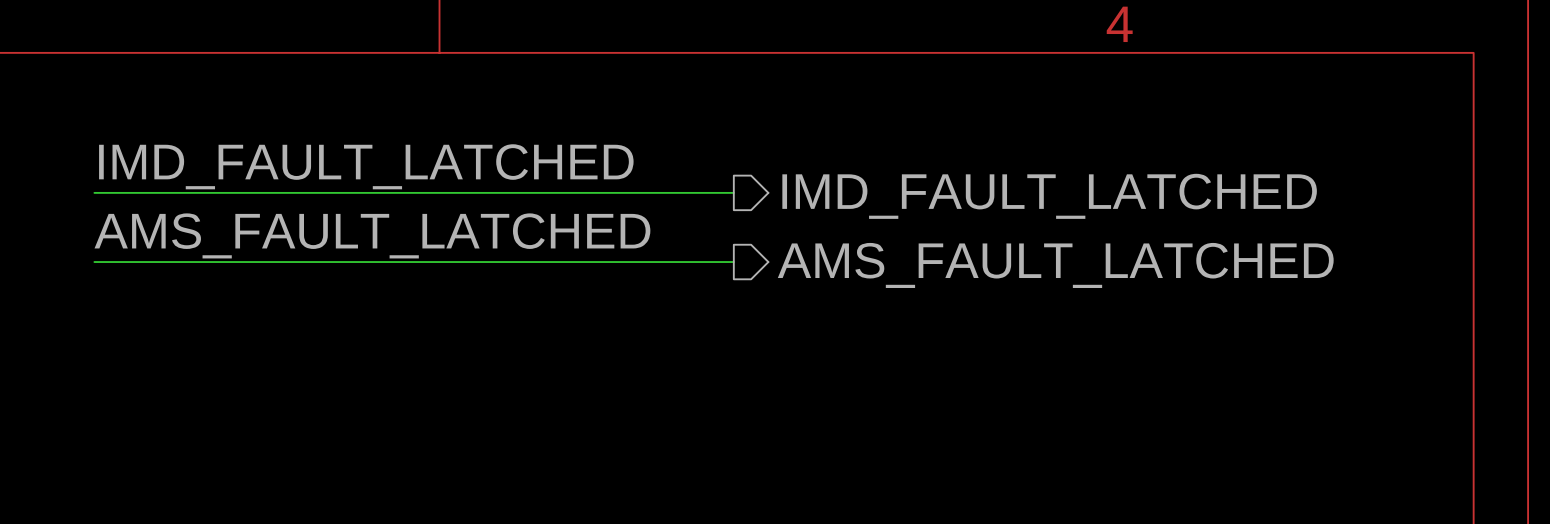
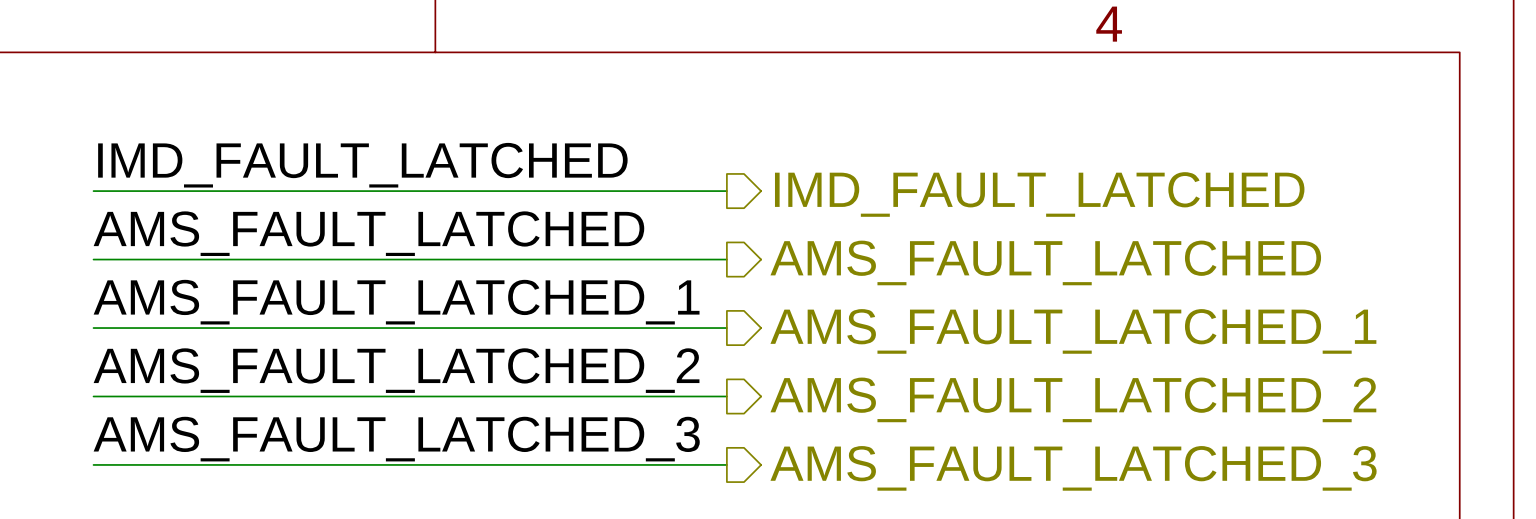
label: none -> AMS_FAULT_LATCHED_1 (396, 302)
wire: none -> (93, 328) (726, 328)
hierarchical label: none -> AMS_FAULT_LATCHED_1 (1073, 331)
label: none -> AMS_FAULT_LATCHED_2 (396, 370)
wire: none -> (93, 396) (726, 396)
hierarchical label: none -> AMS_FAULT_LATCHED_2 (1073, 399)
label: none -> AMS_FAULT_LATCHED_3 (396, 439)
wire: none -> (93, 464) (726, 464)
hierarchical label: none -> AMS_FAULT_LATCHED_3 (1073, 468)

